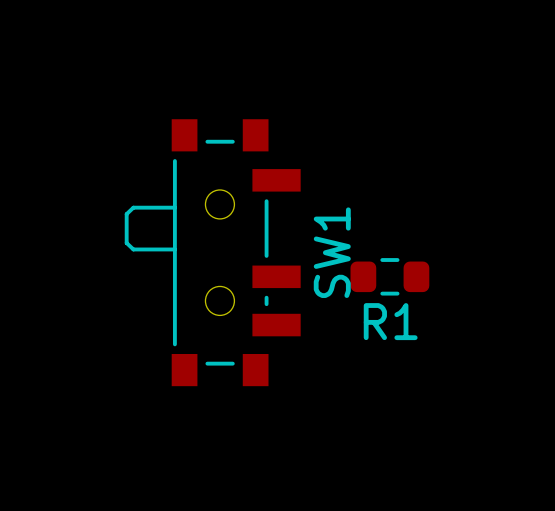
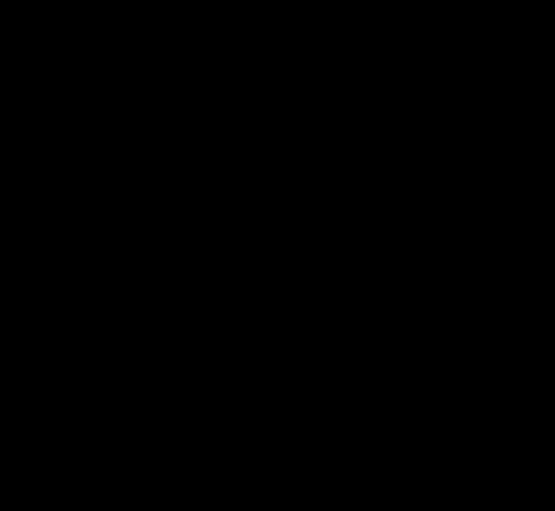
SW1: (212, 252) -> none
R1: (389, 276) -> none

